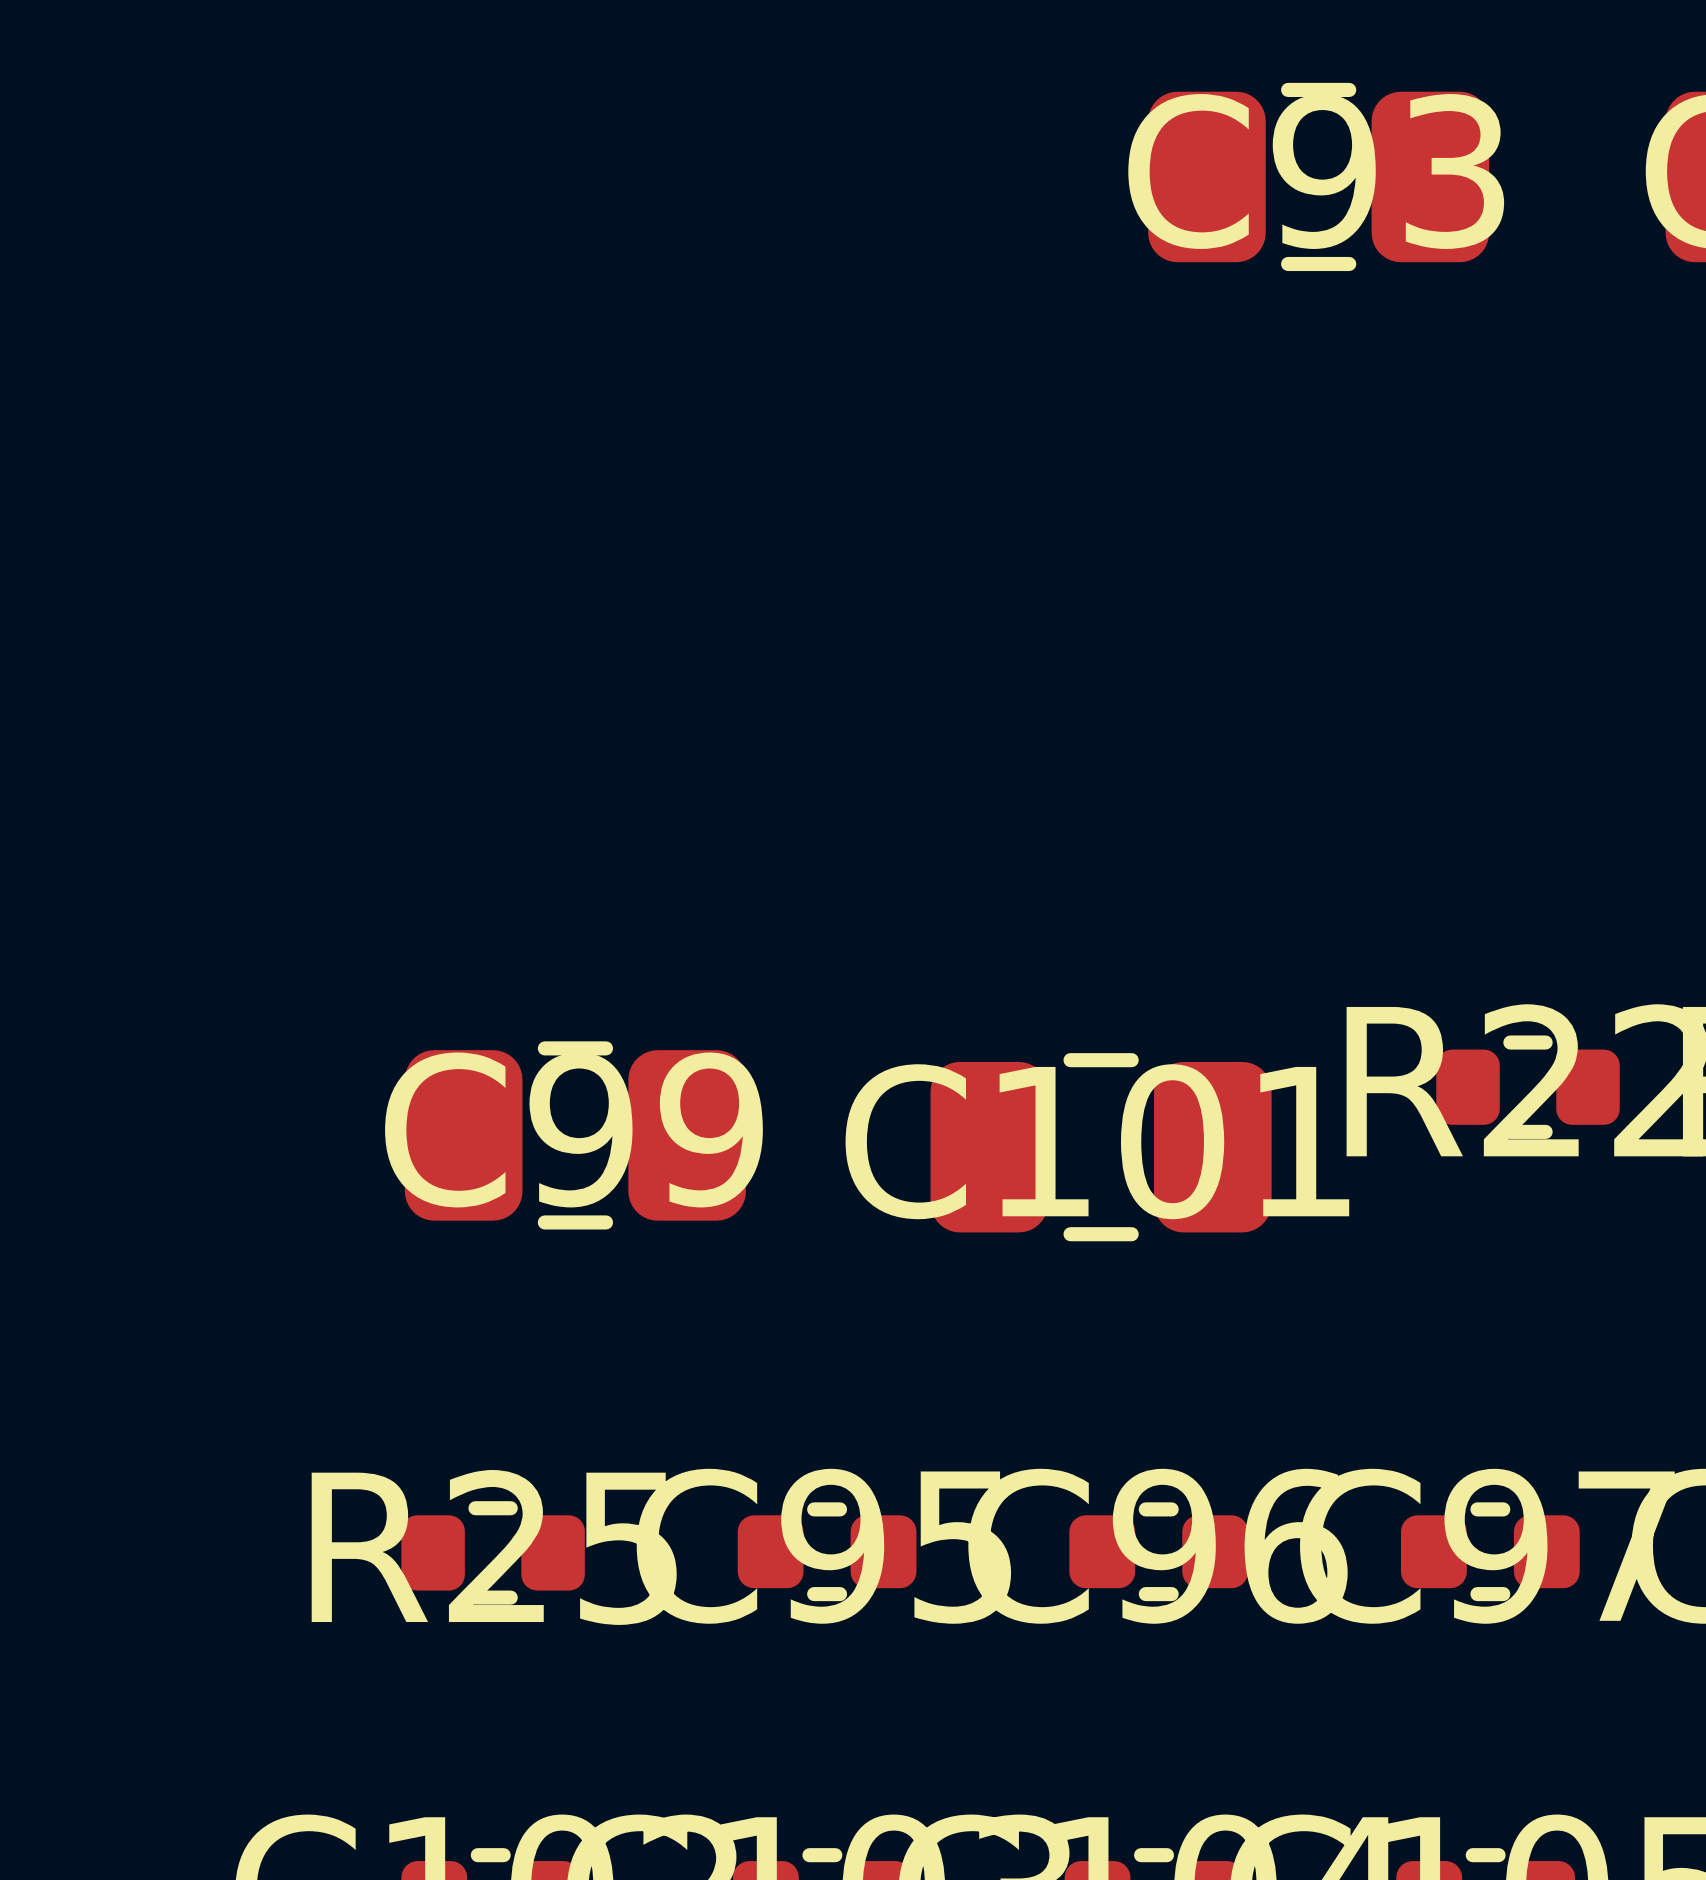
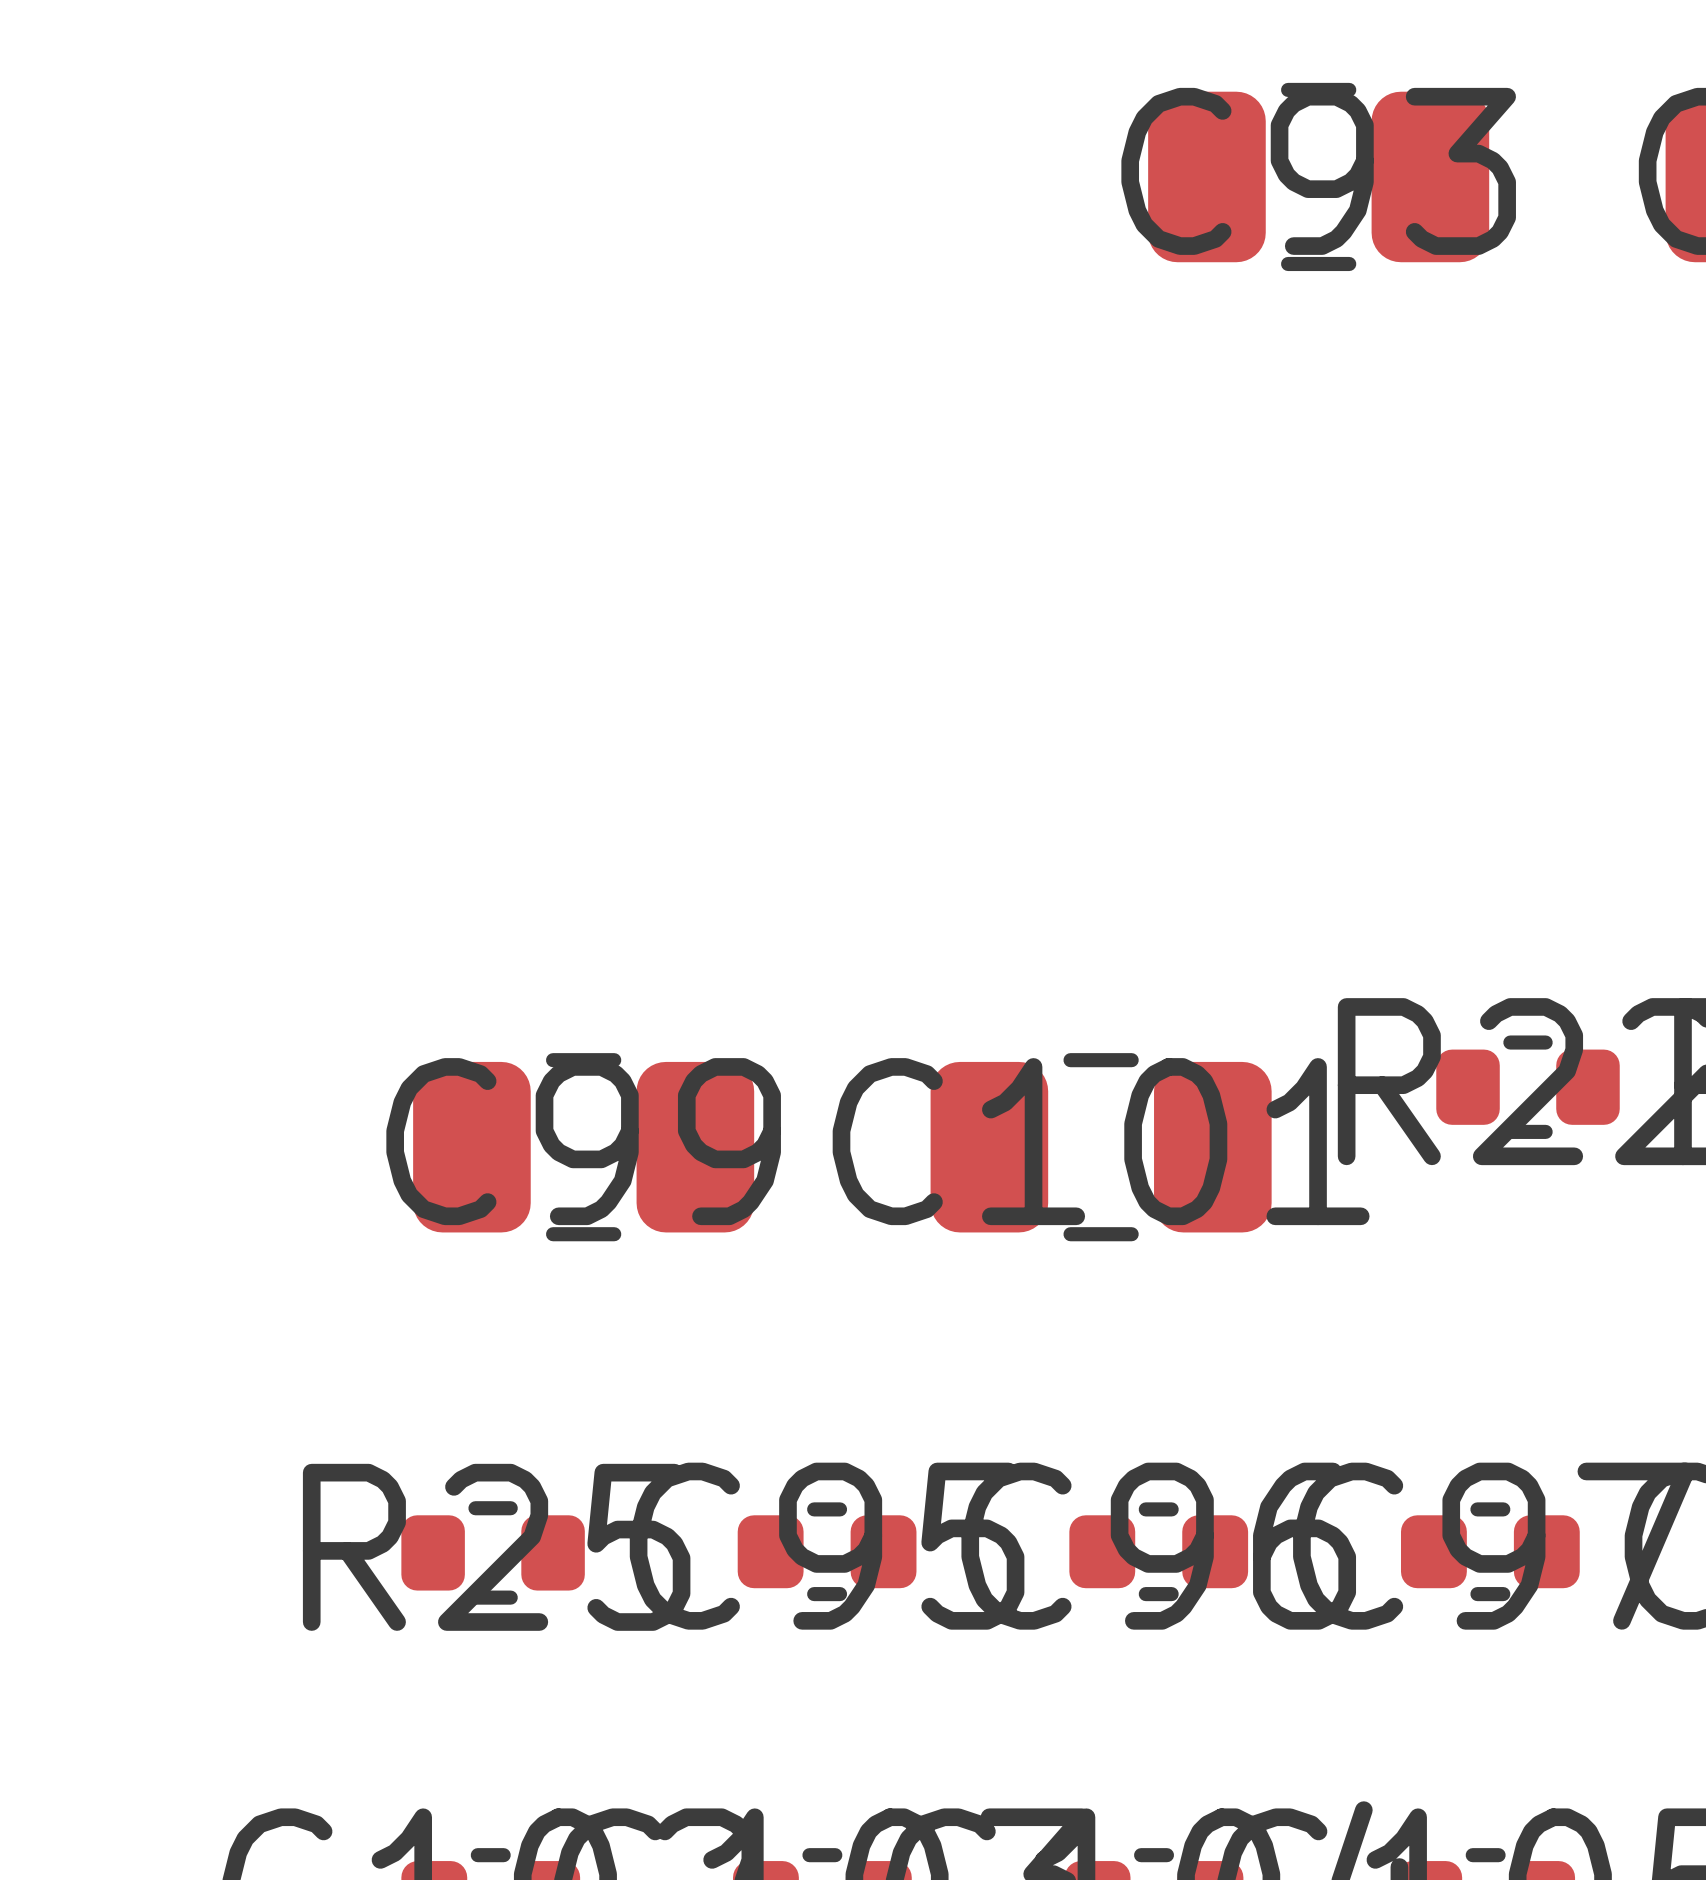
C99 position: (575, 1135) -> (583, 1147)

